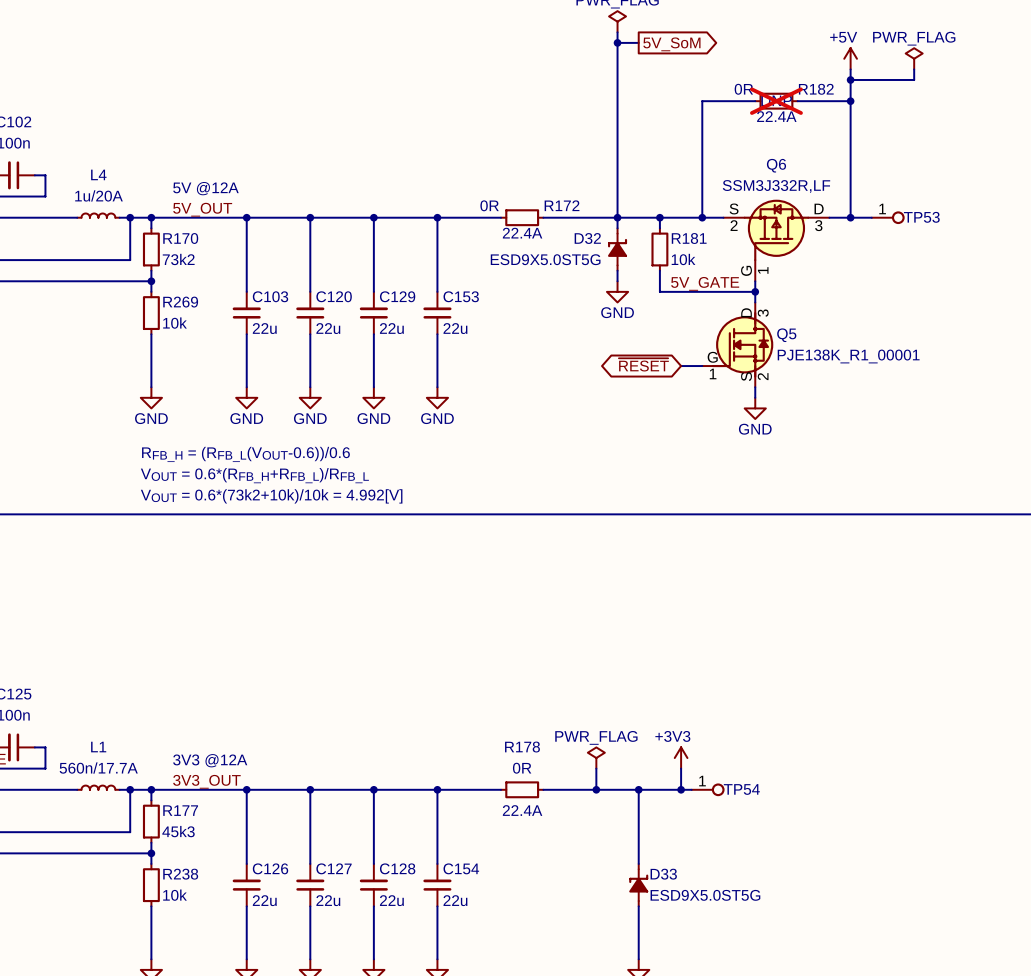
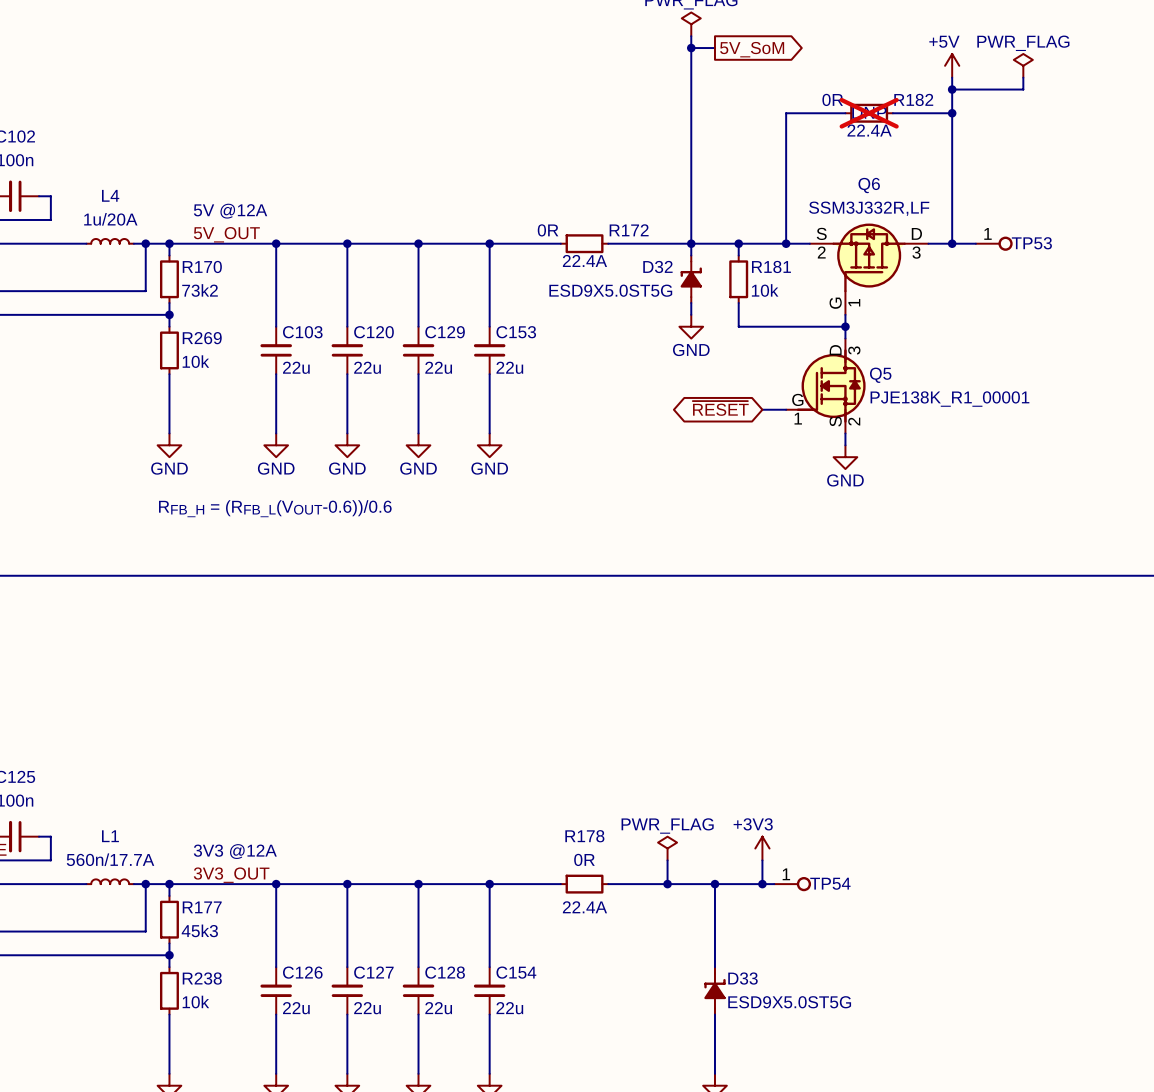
label: 5V_GATE (705, 283) -> none
text: VOUT = 0.6*(RFB_H+RFB_L)/RFB_L (254, 475) -> none
text: VOUT = 0.6*(73k2+10k)/10k = 4.992[V] (271, 496) -> none

